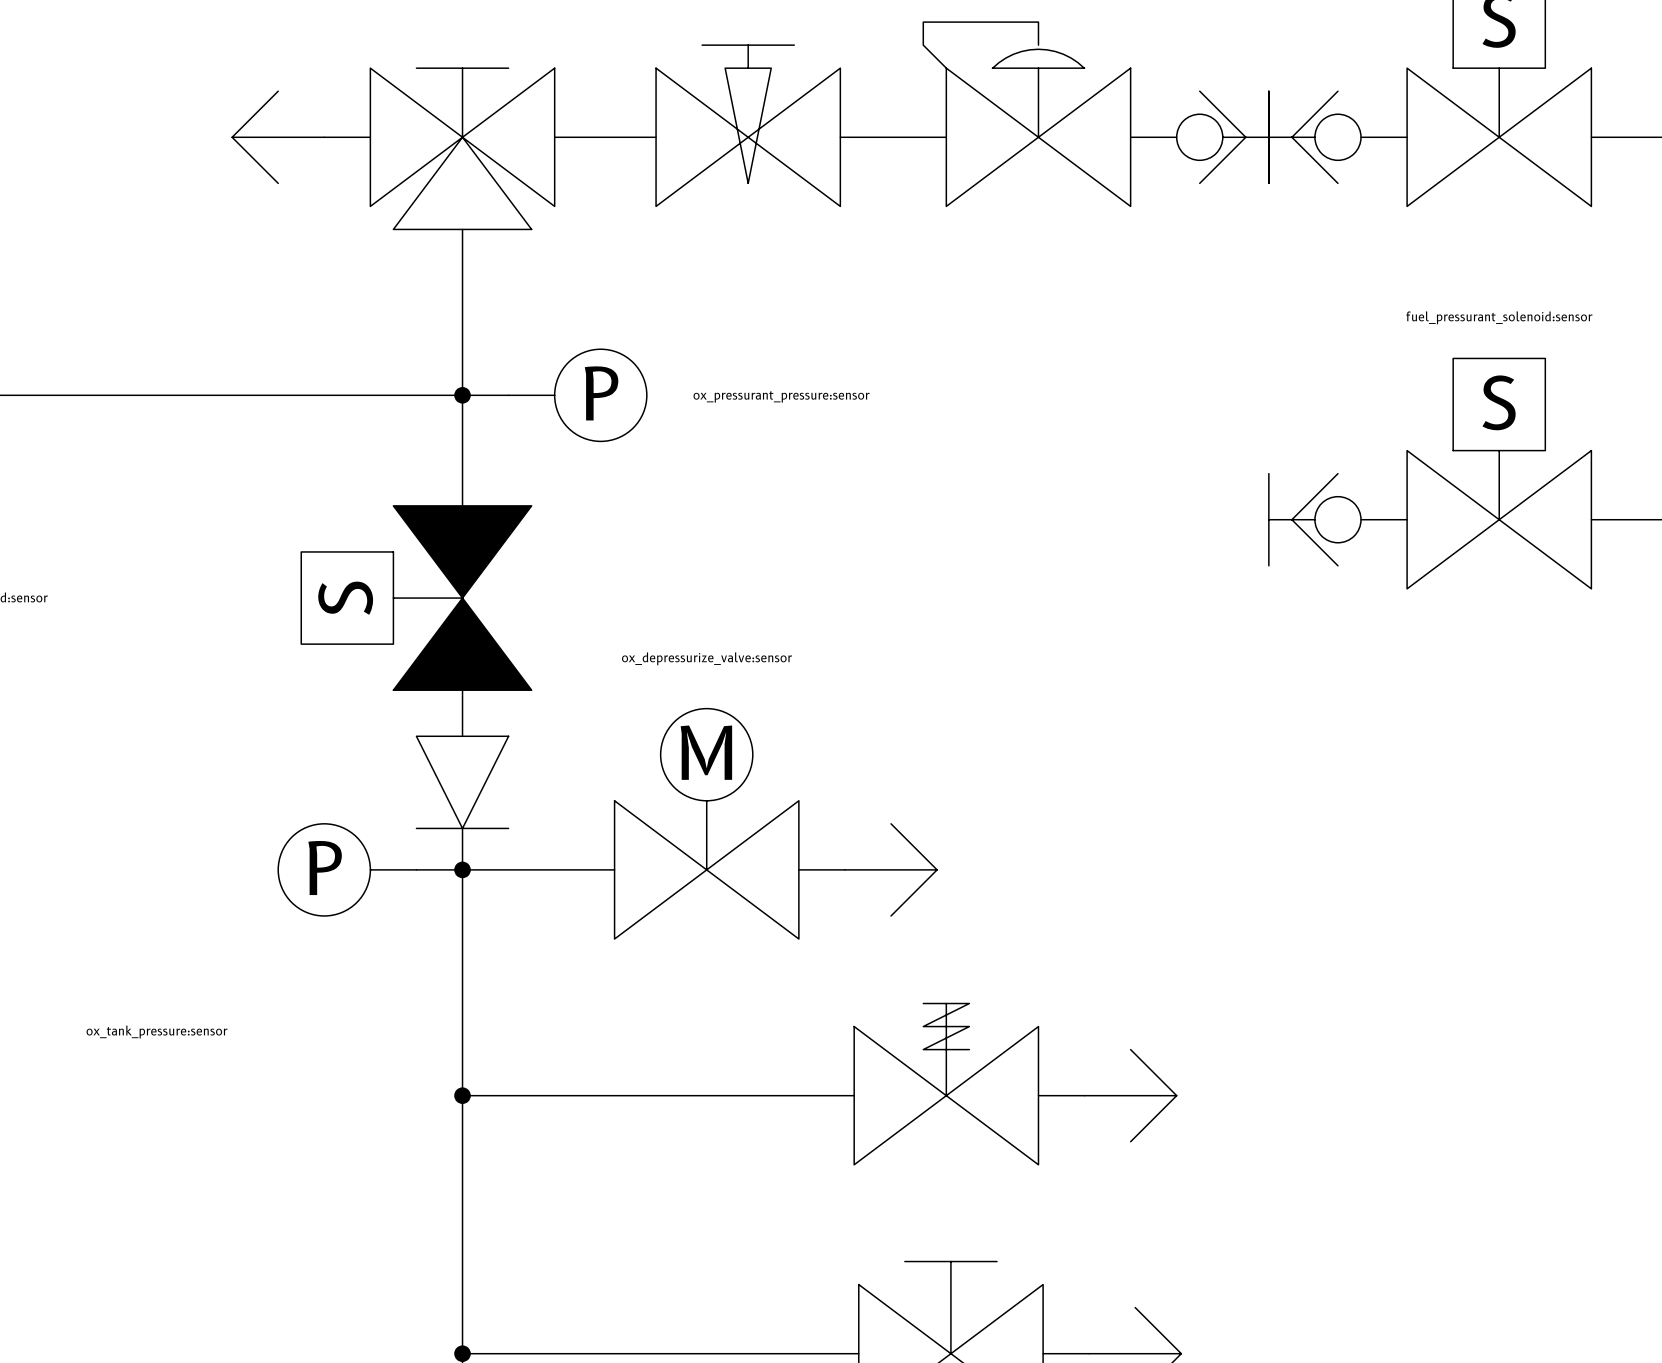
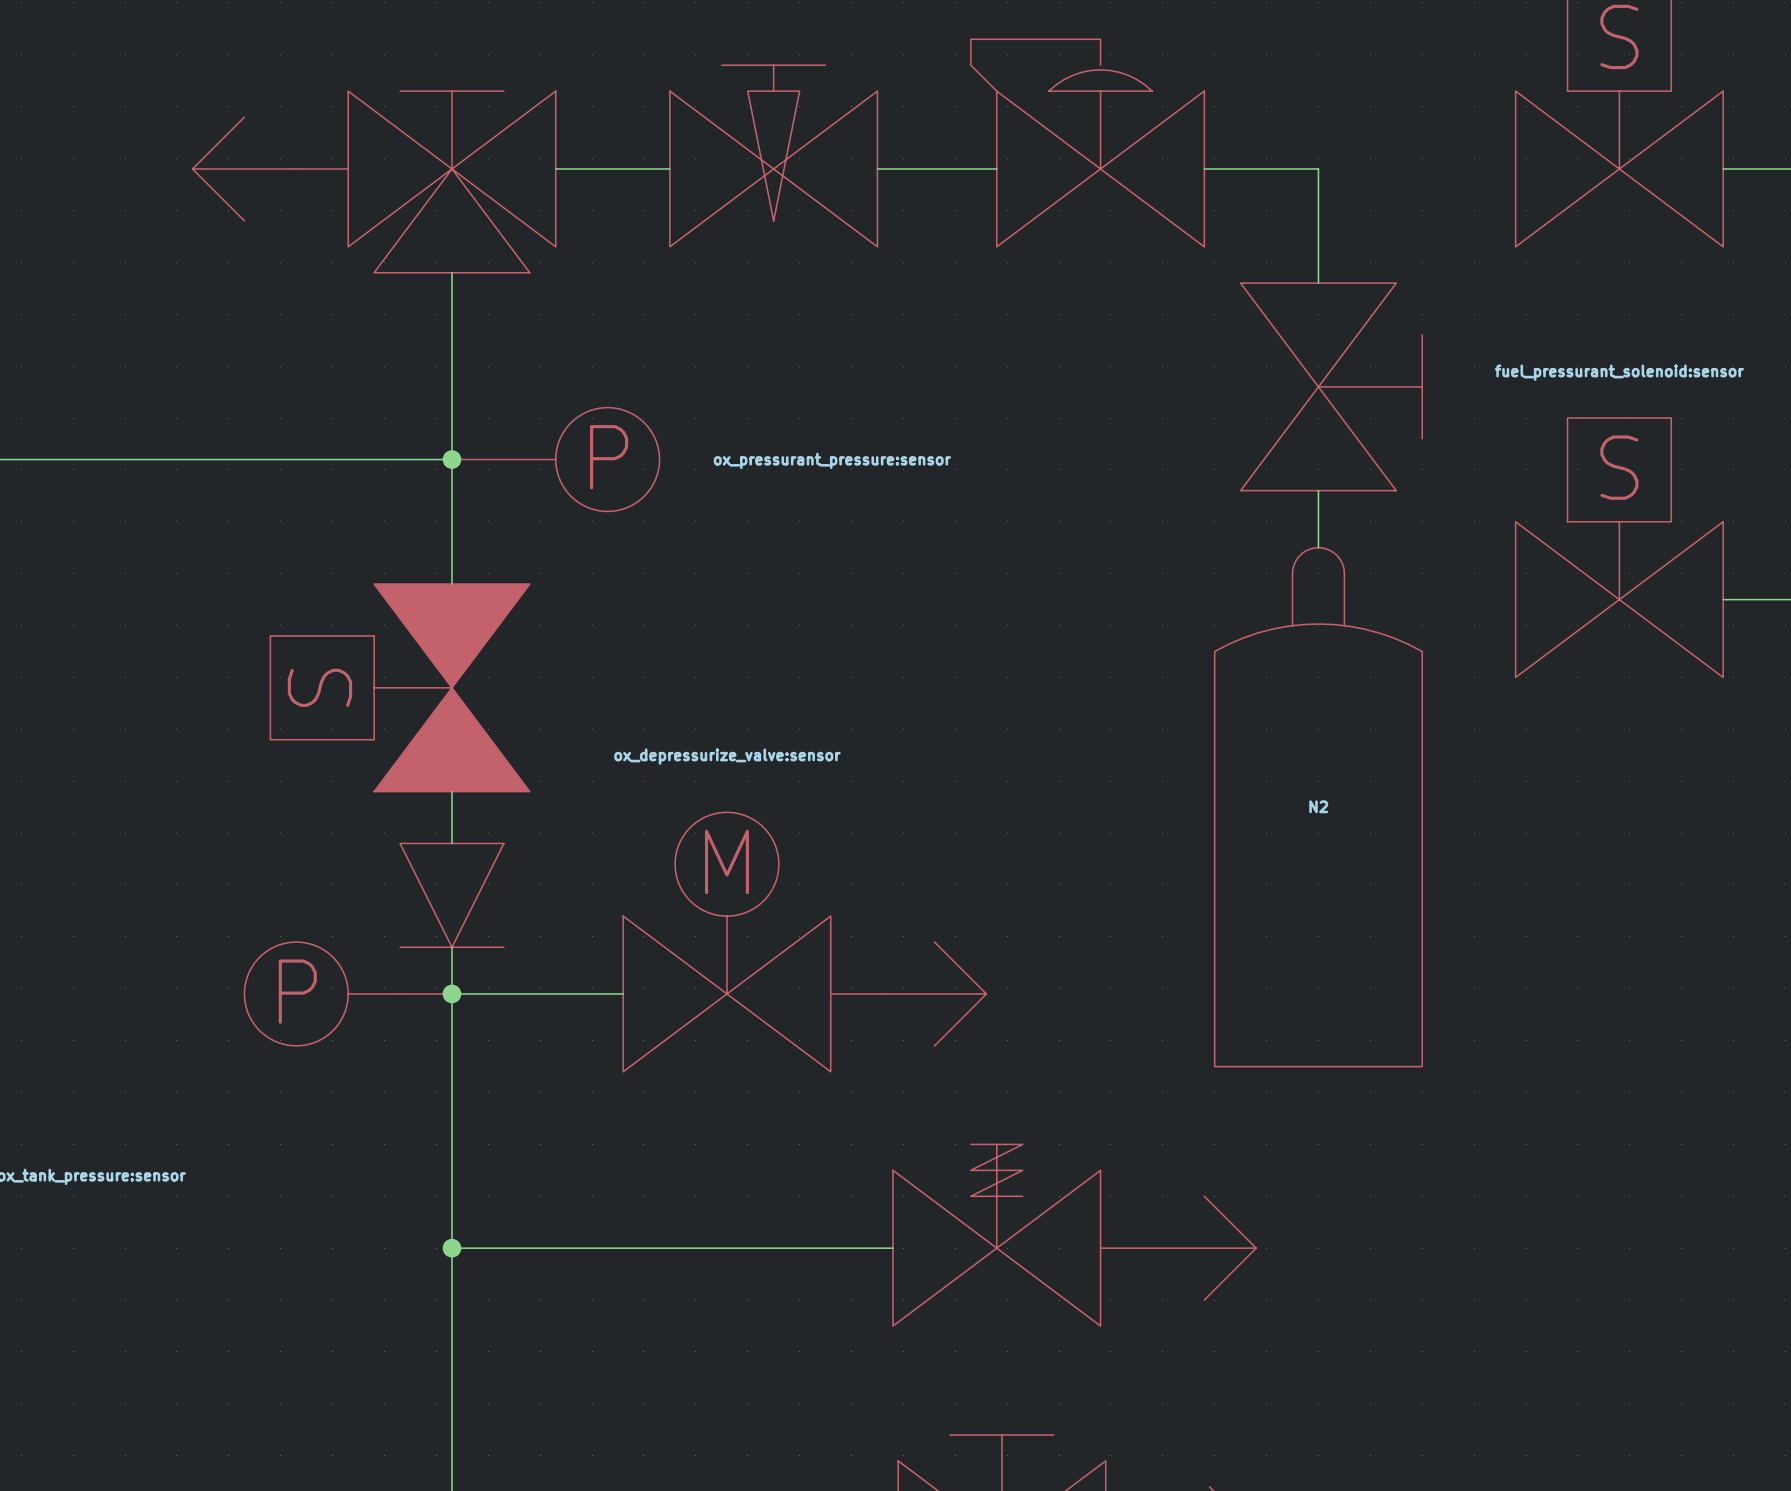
wire: none -> (1204, 168) (1318, 168) (1318, 283)
part: (1199, 137) -> none
part: (1337, 137) -> none
part: none -> (1331, 386)
wire: none -> (1318, 490) (1318, 547)
part: (1337, 519) -> none
N2: none -> (1318, 807)

